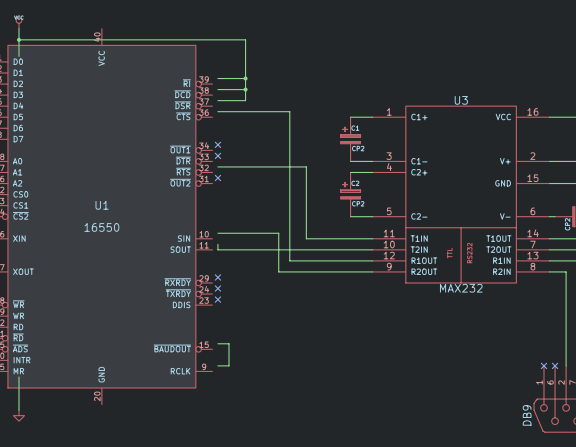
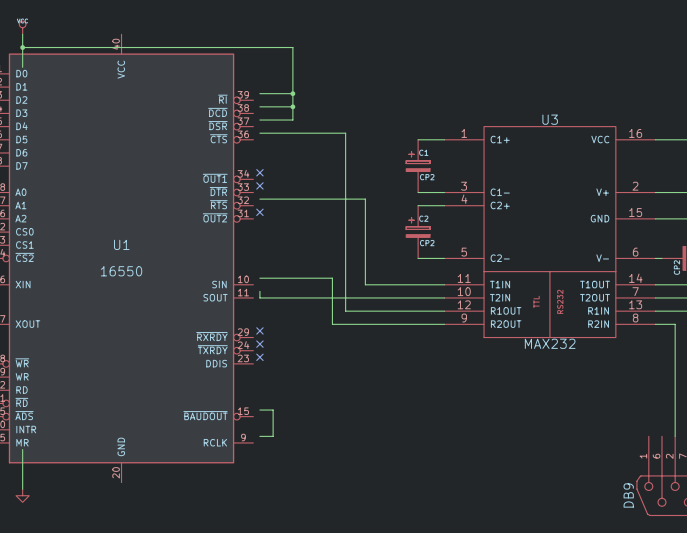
no-connect mark: (543, 365) -> none
no-connect mark: (555, 365) -> none

